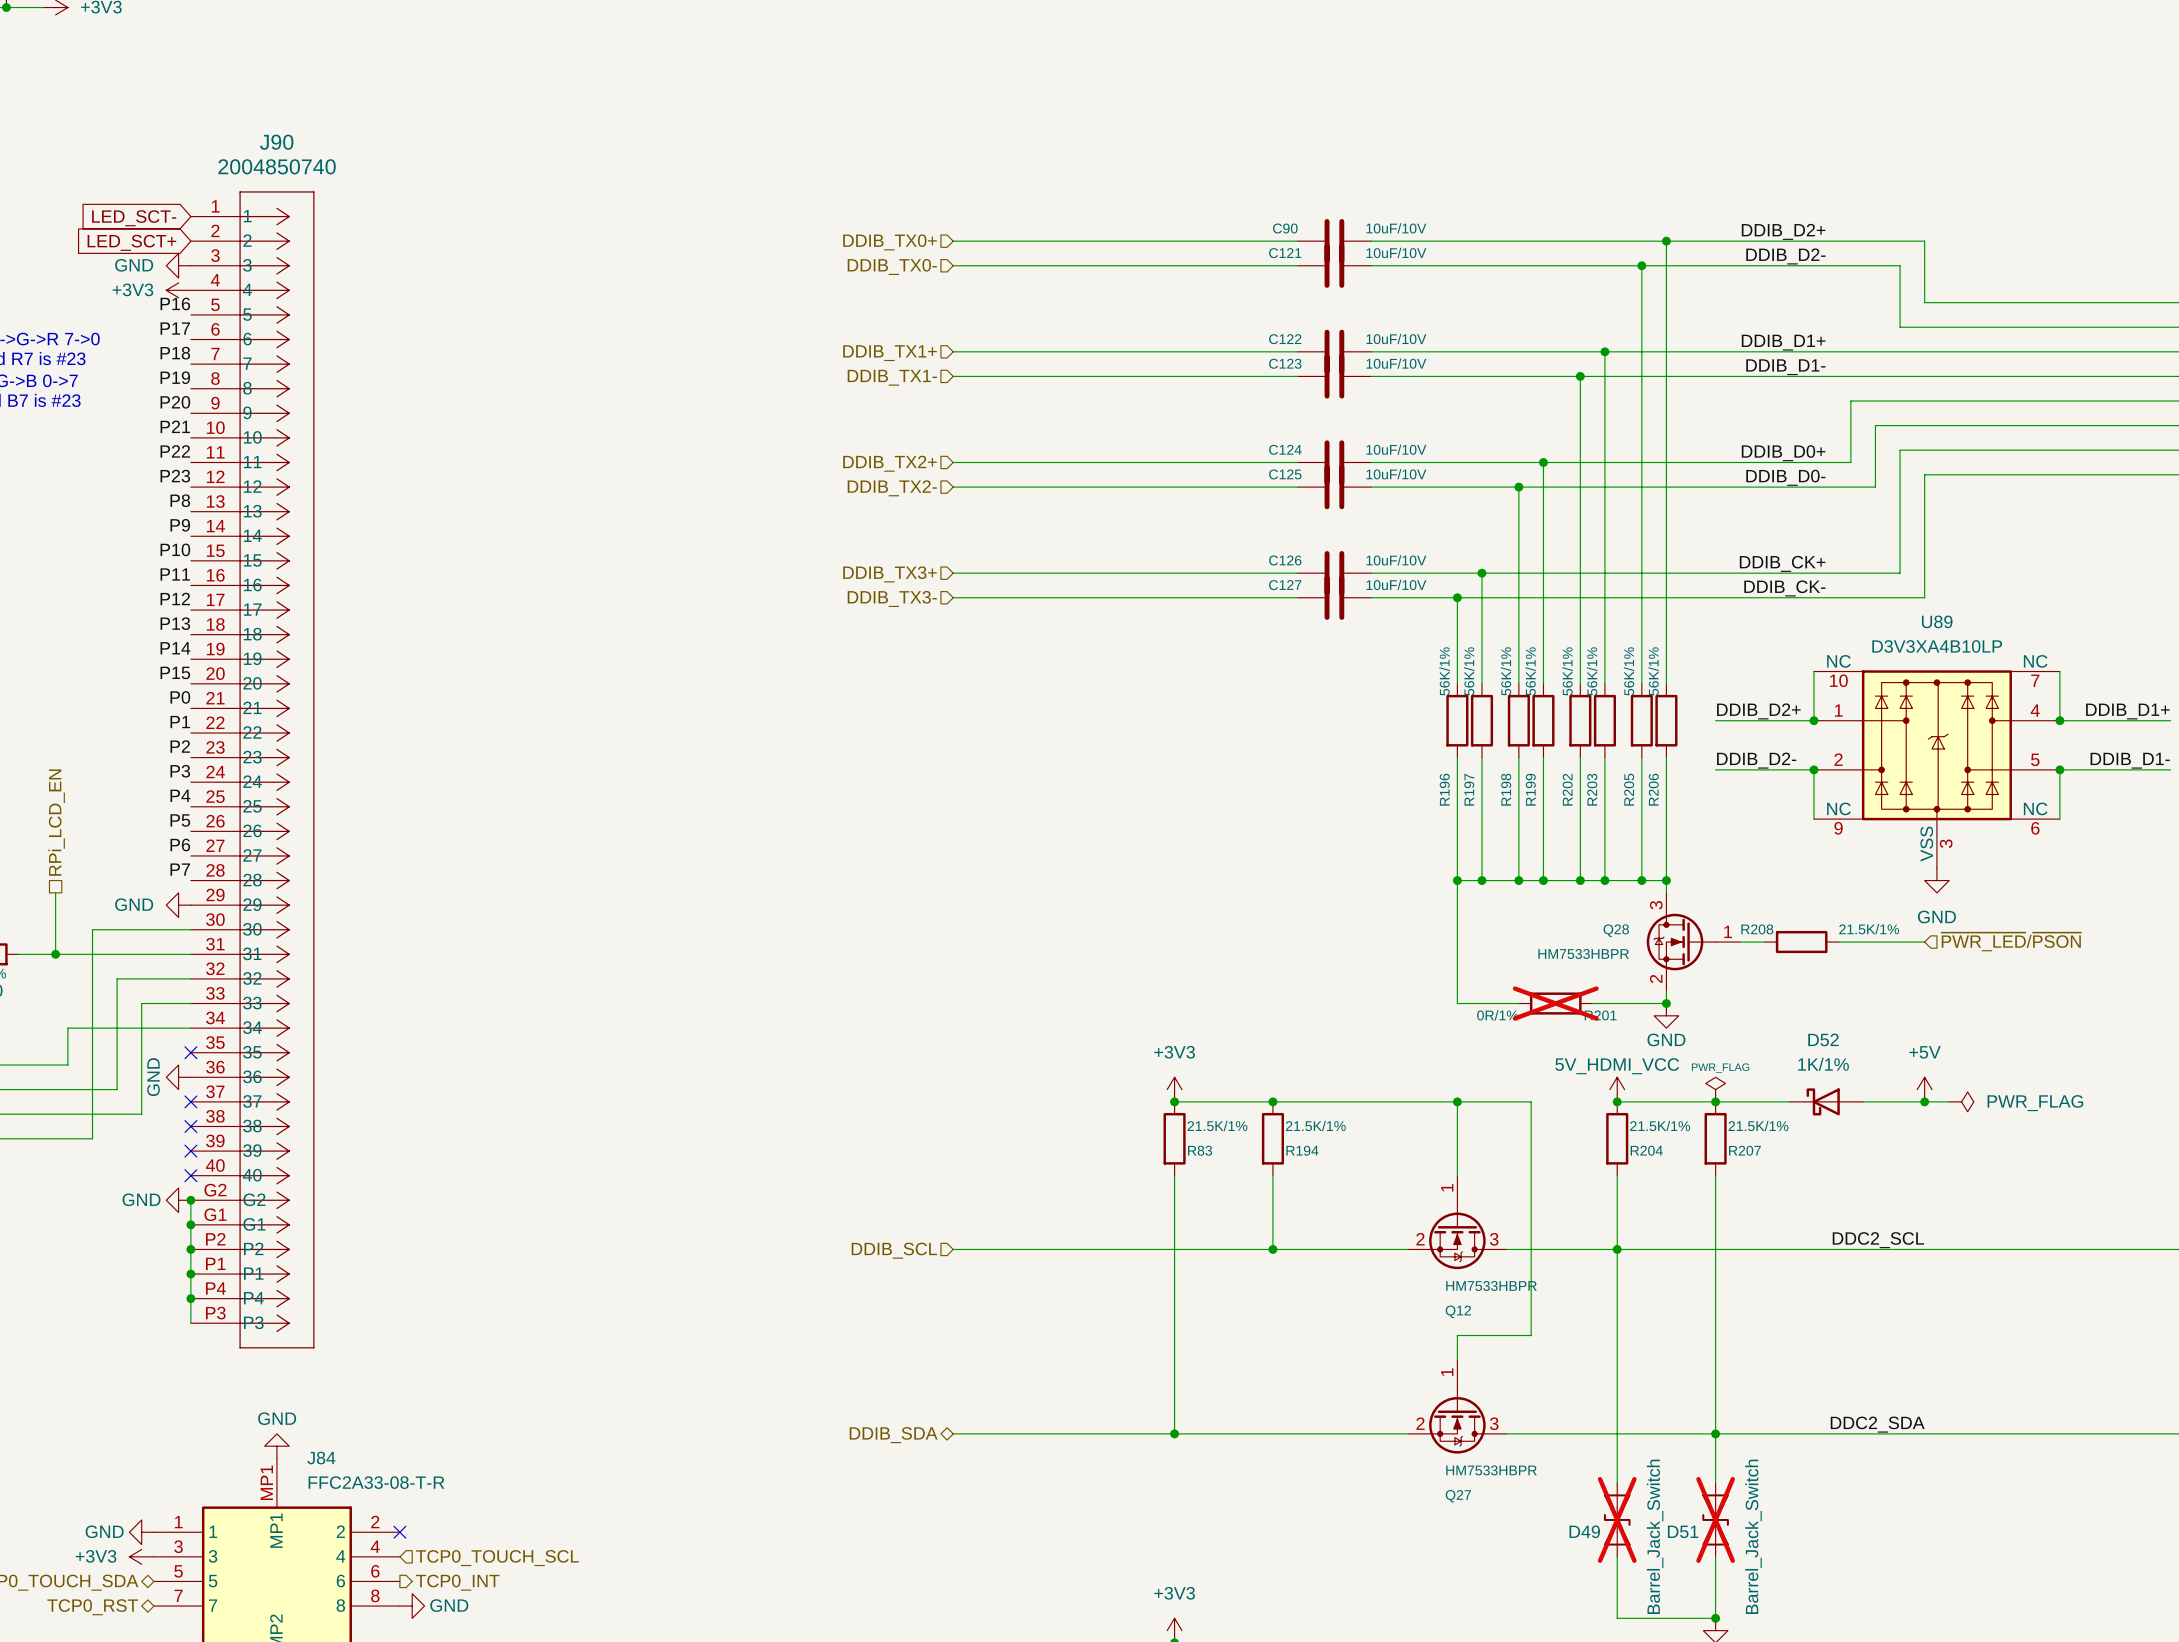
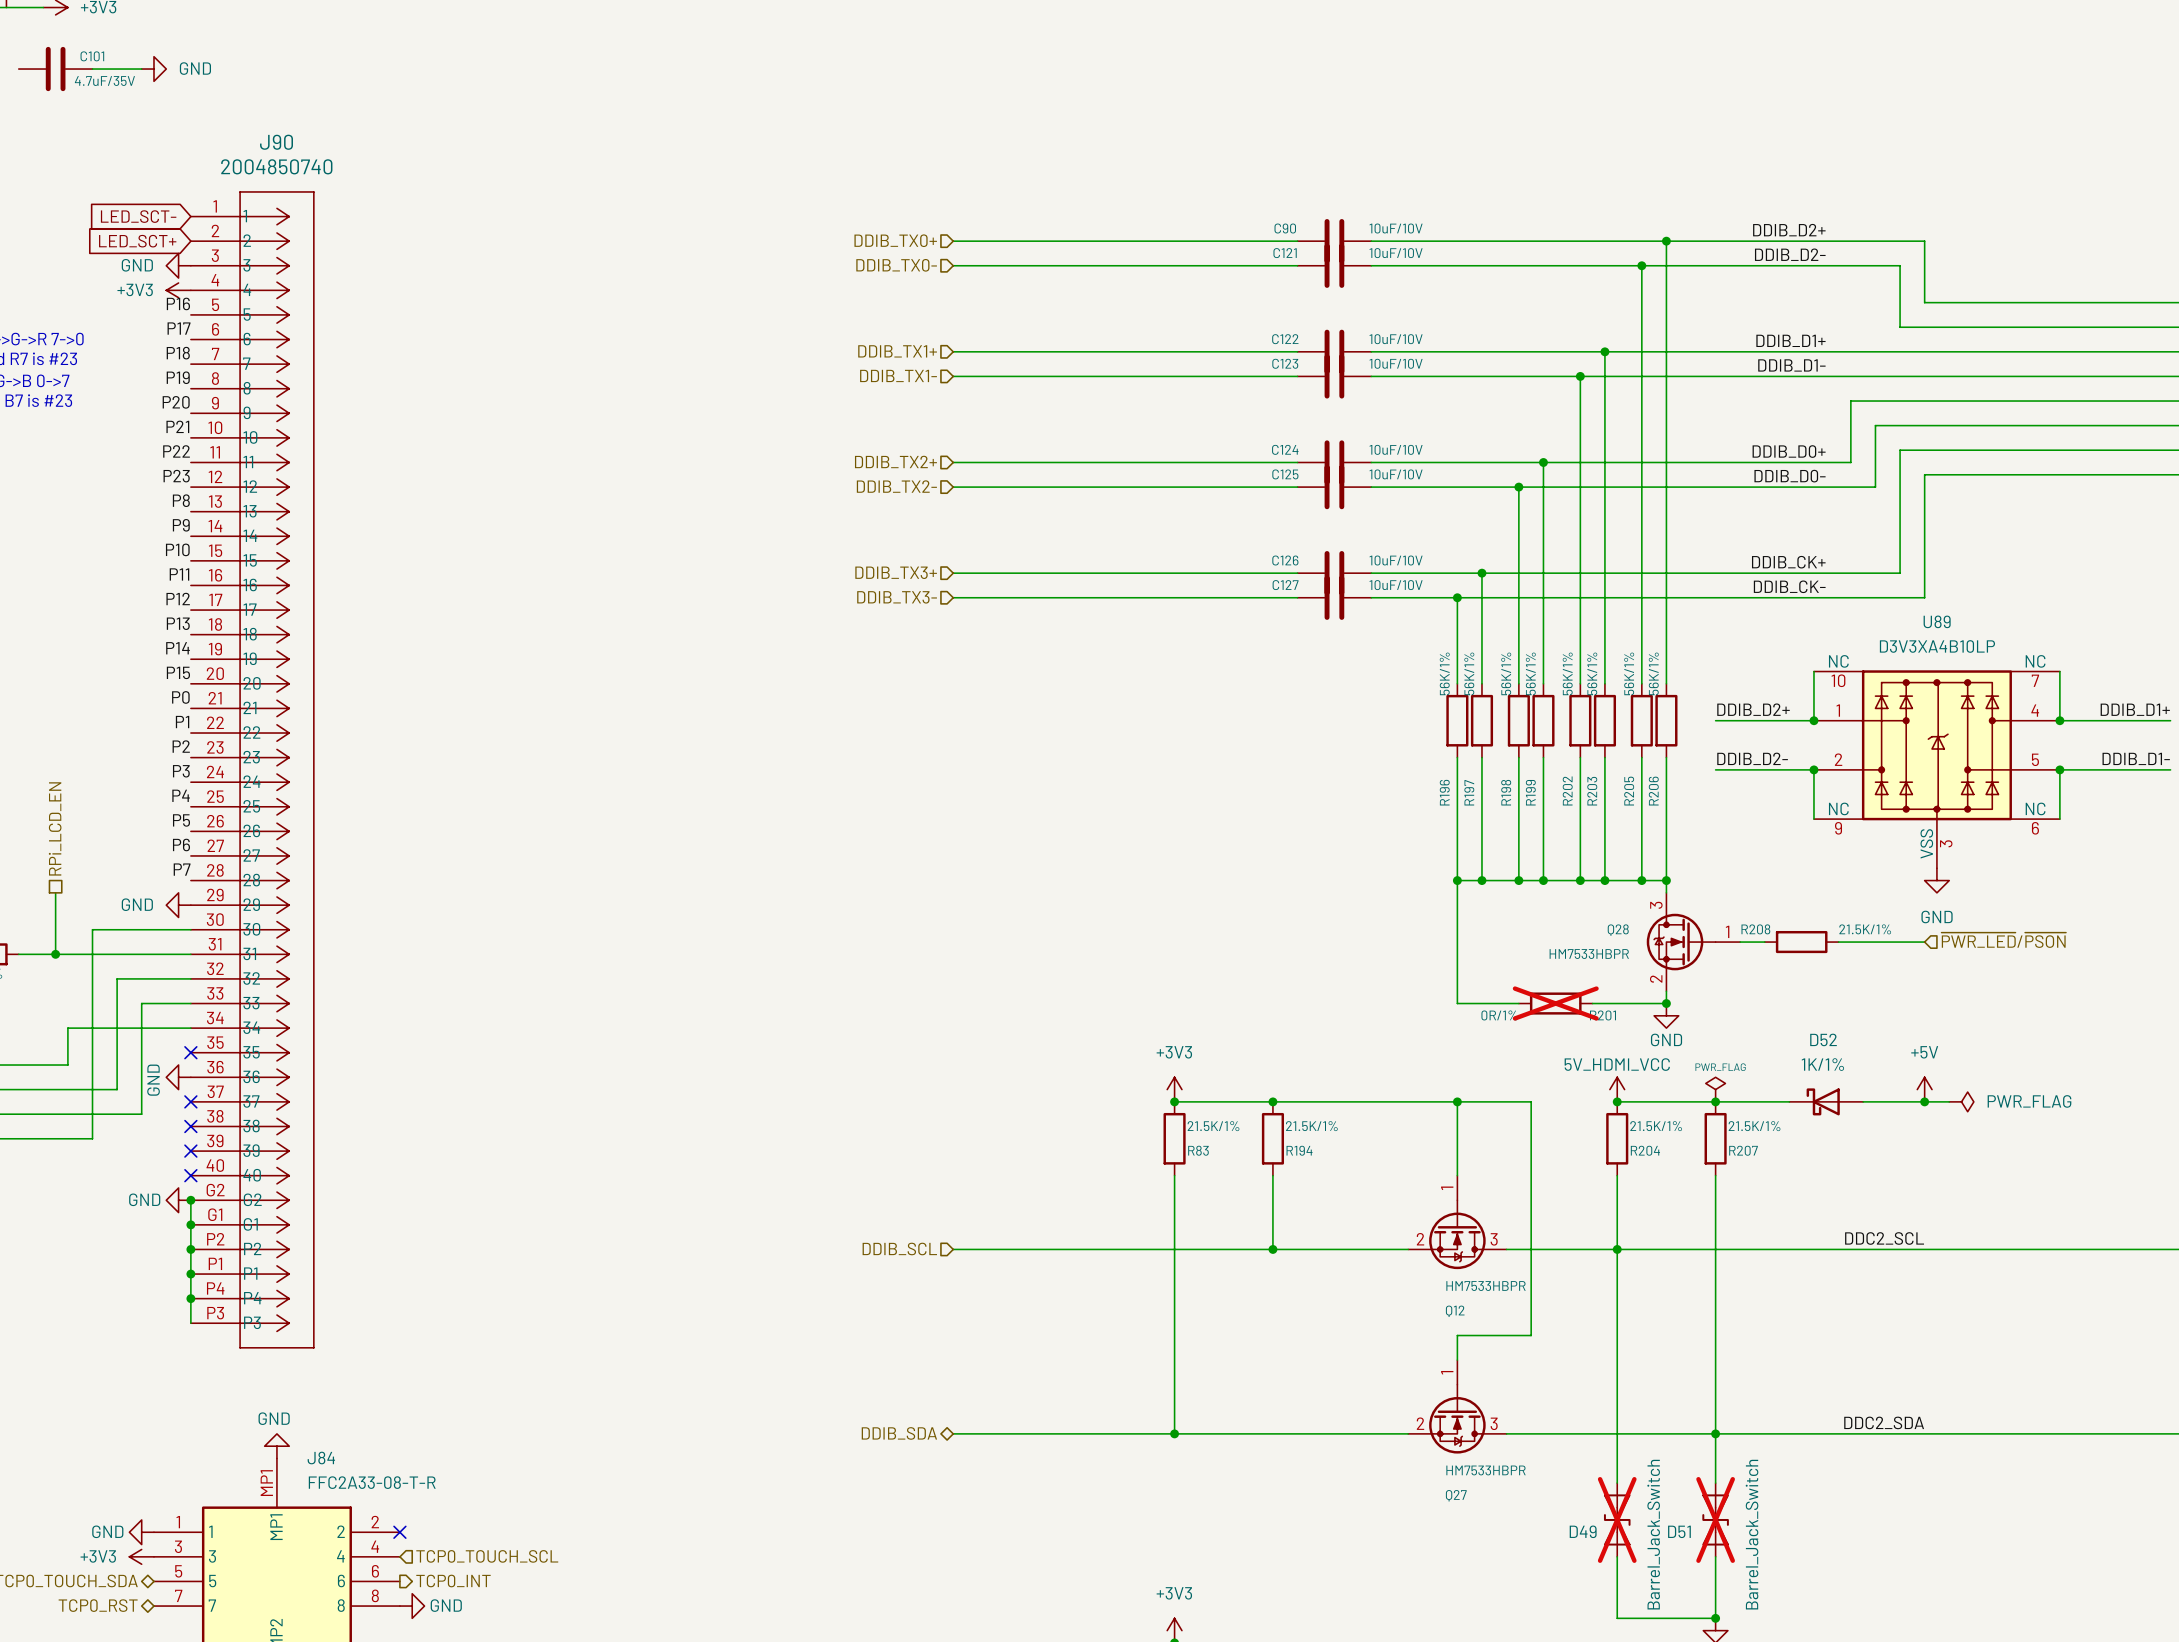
junction: (6, 7) -> none
C101: none -> 4.7uF/35V (55, 69)
wire: none -> (92, 69) (141, 69)
power symbol: none -> GND (153, 69)

